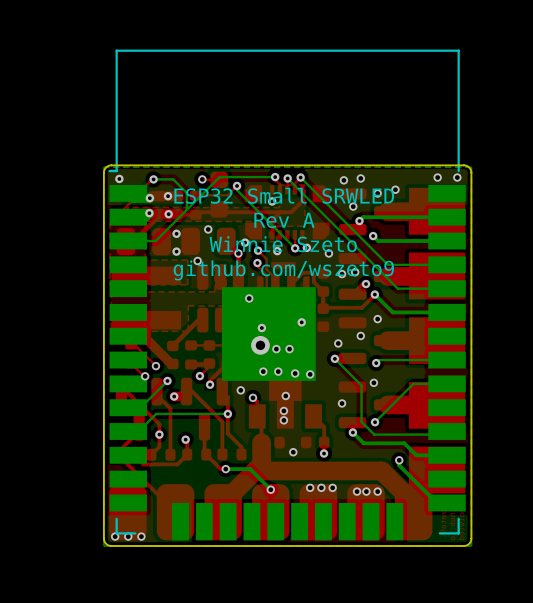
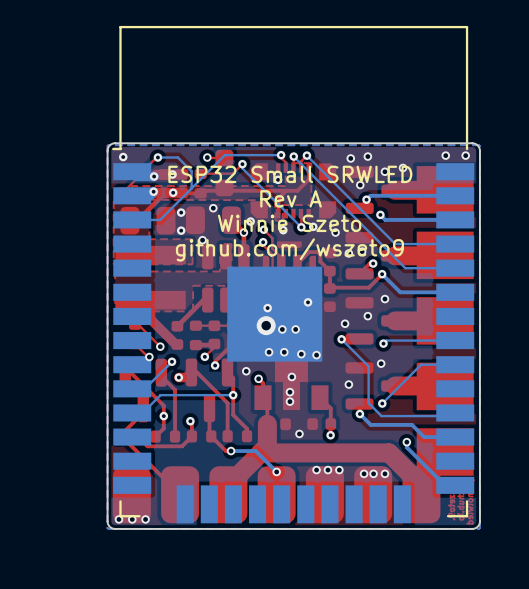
via: (249, 298) -> none

